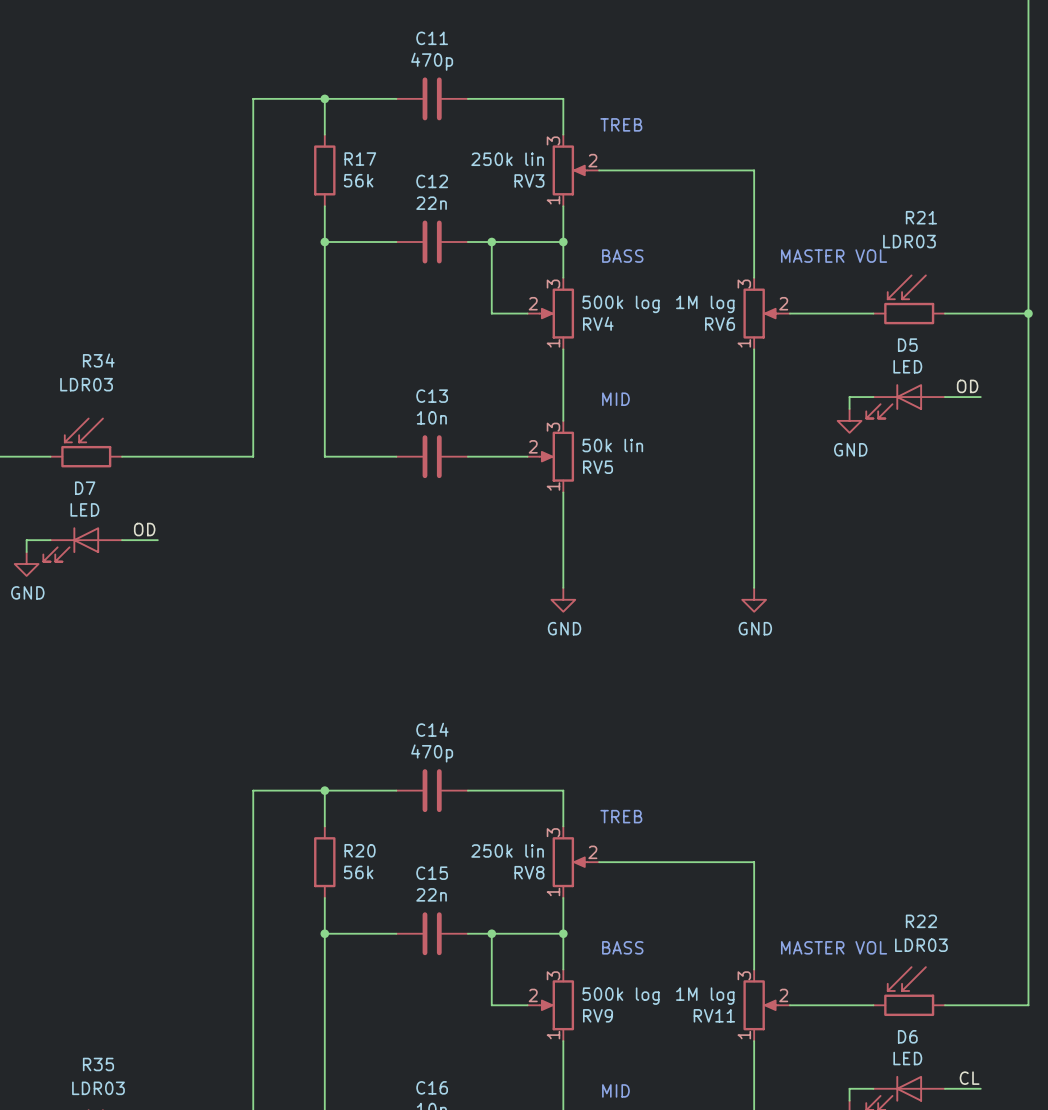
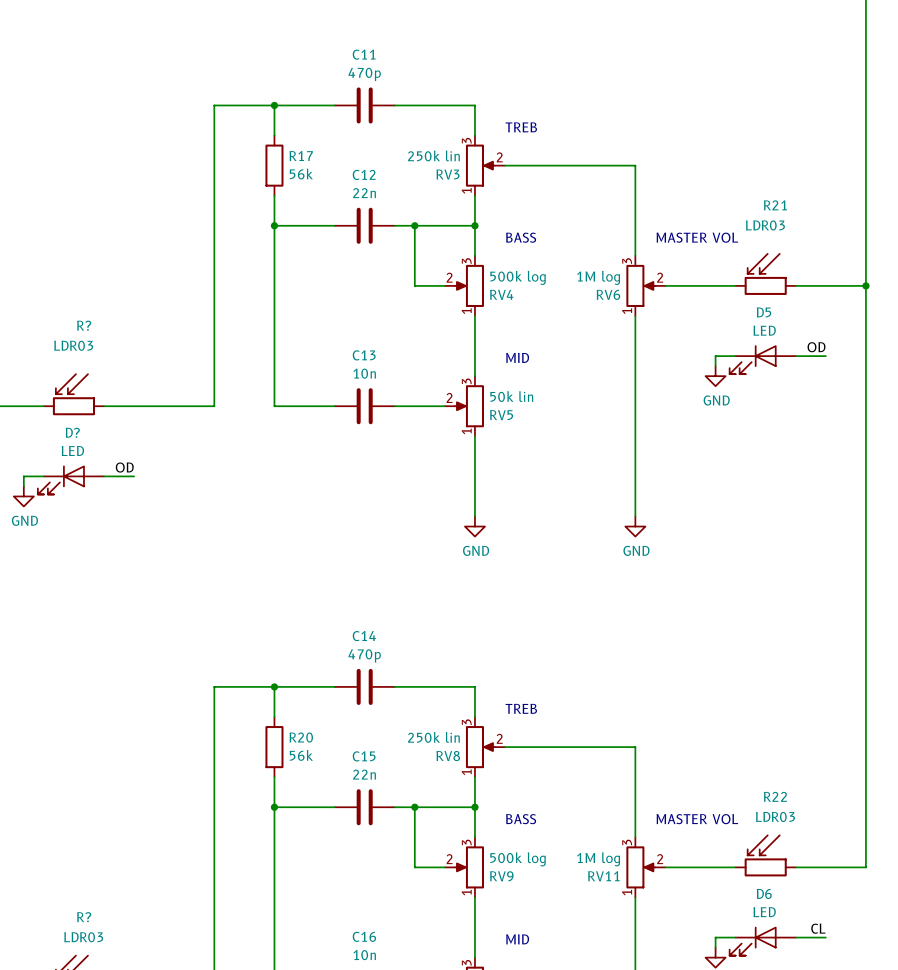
R34 name: R34 (98, 360) -> R? (84, 325)
D7 name: D7 (85, 488) -> D? (72, 432)
R35 name: R35 (98, 1064) -> R? (84, 917)

